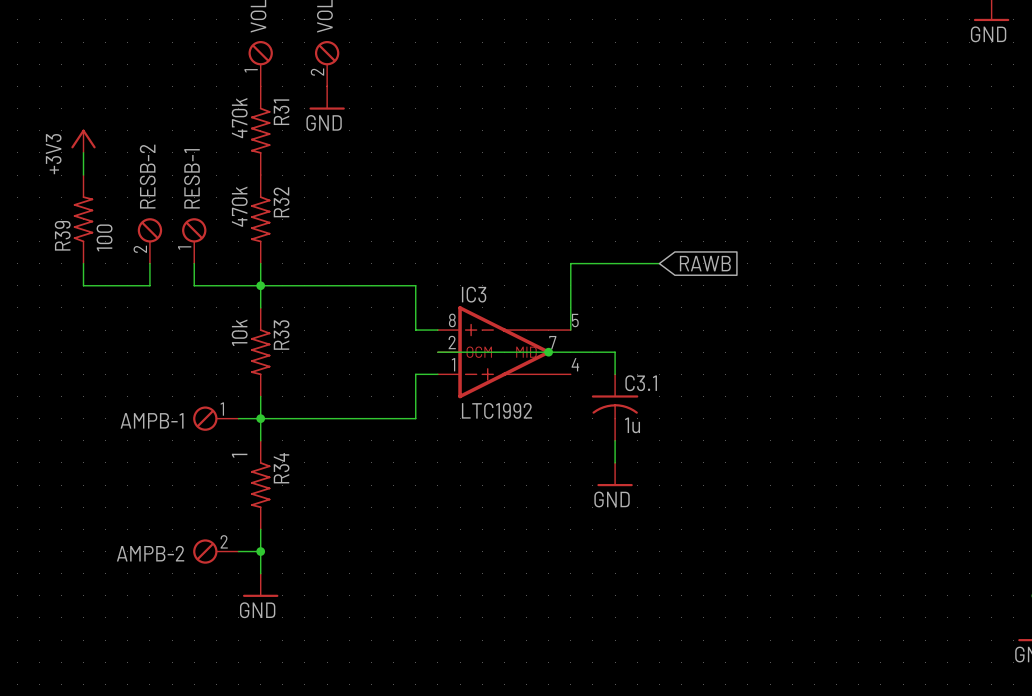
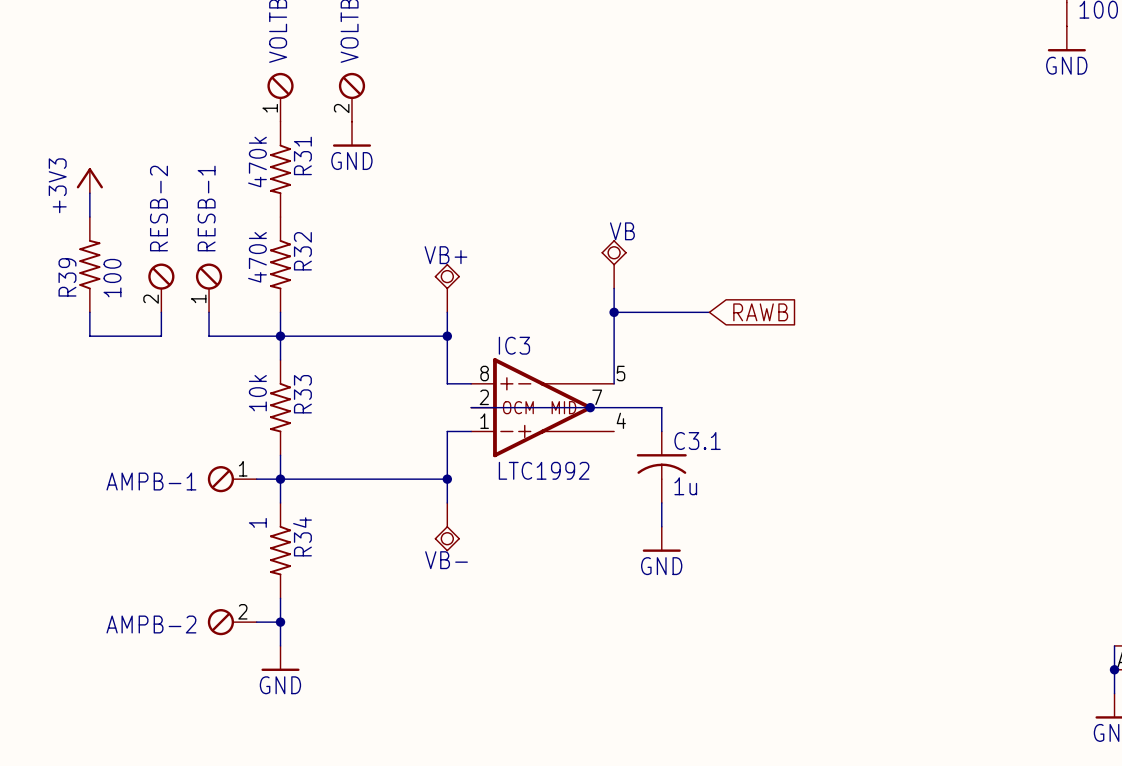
VB: none -> (614, 264)
VB+: none -> (447, 288)
wire: none -> (614, 288) (614, 312)
wire: none -> (447, 312) (447, 336)
junction: none -> (614, 312)
junction: none -> (447, 336)
wire: none -> (447, 479) (447, 502)
junction: none -> (447, 479)
VB-: none -> (447, 527)

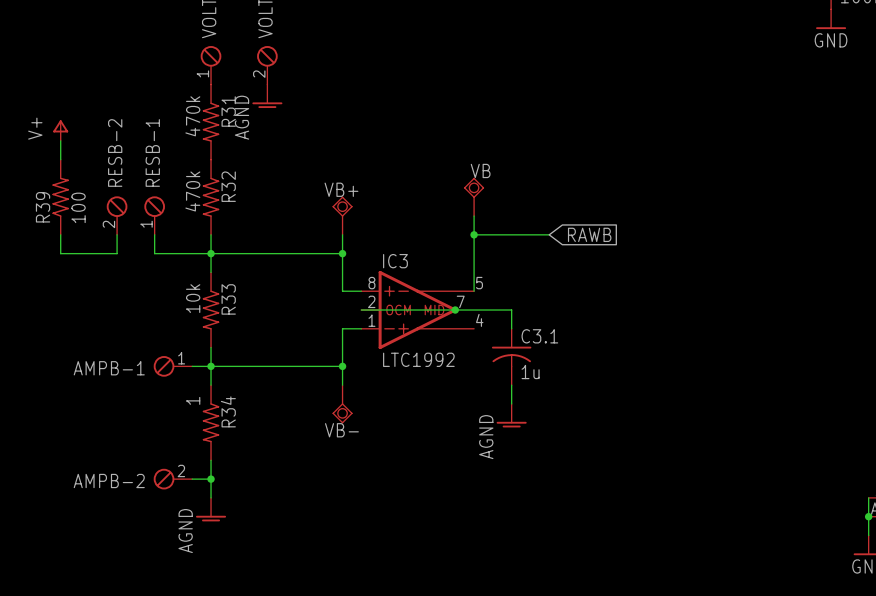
power symbol: GND (351, 134) -> AGND (267, 96)
power symbol: +3V3 (89, 180) -> V+ (60, 130)
power symbol: GND (661, 539) -> AGND (511, 415)
power symbol: GND (280, 658) -> AGND (211, 509)

